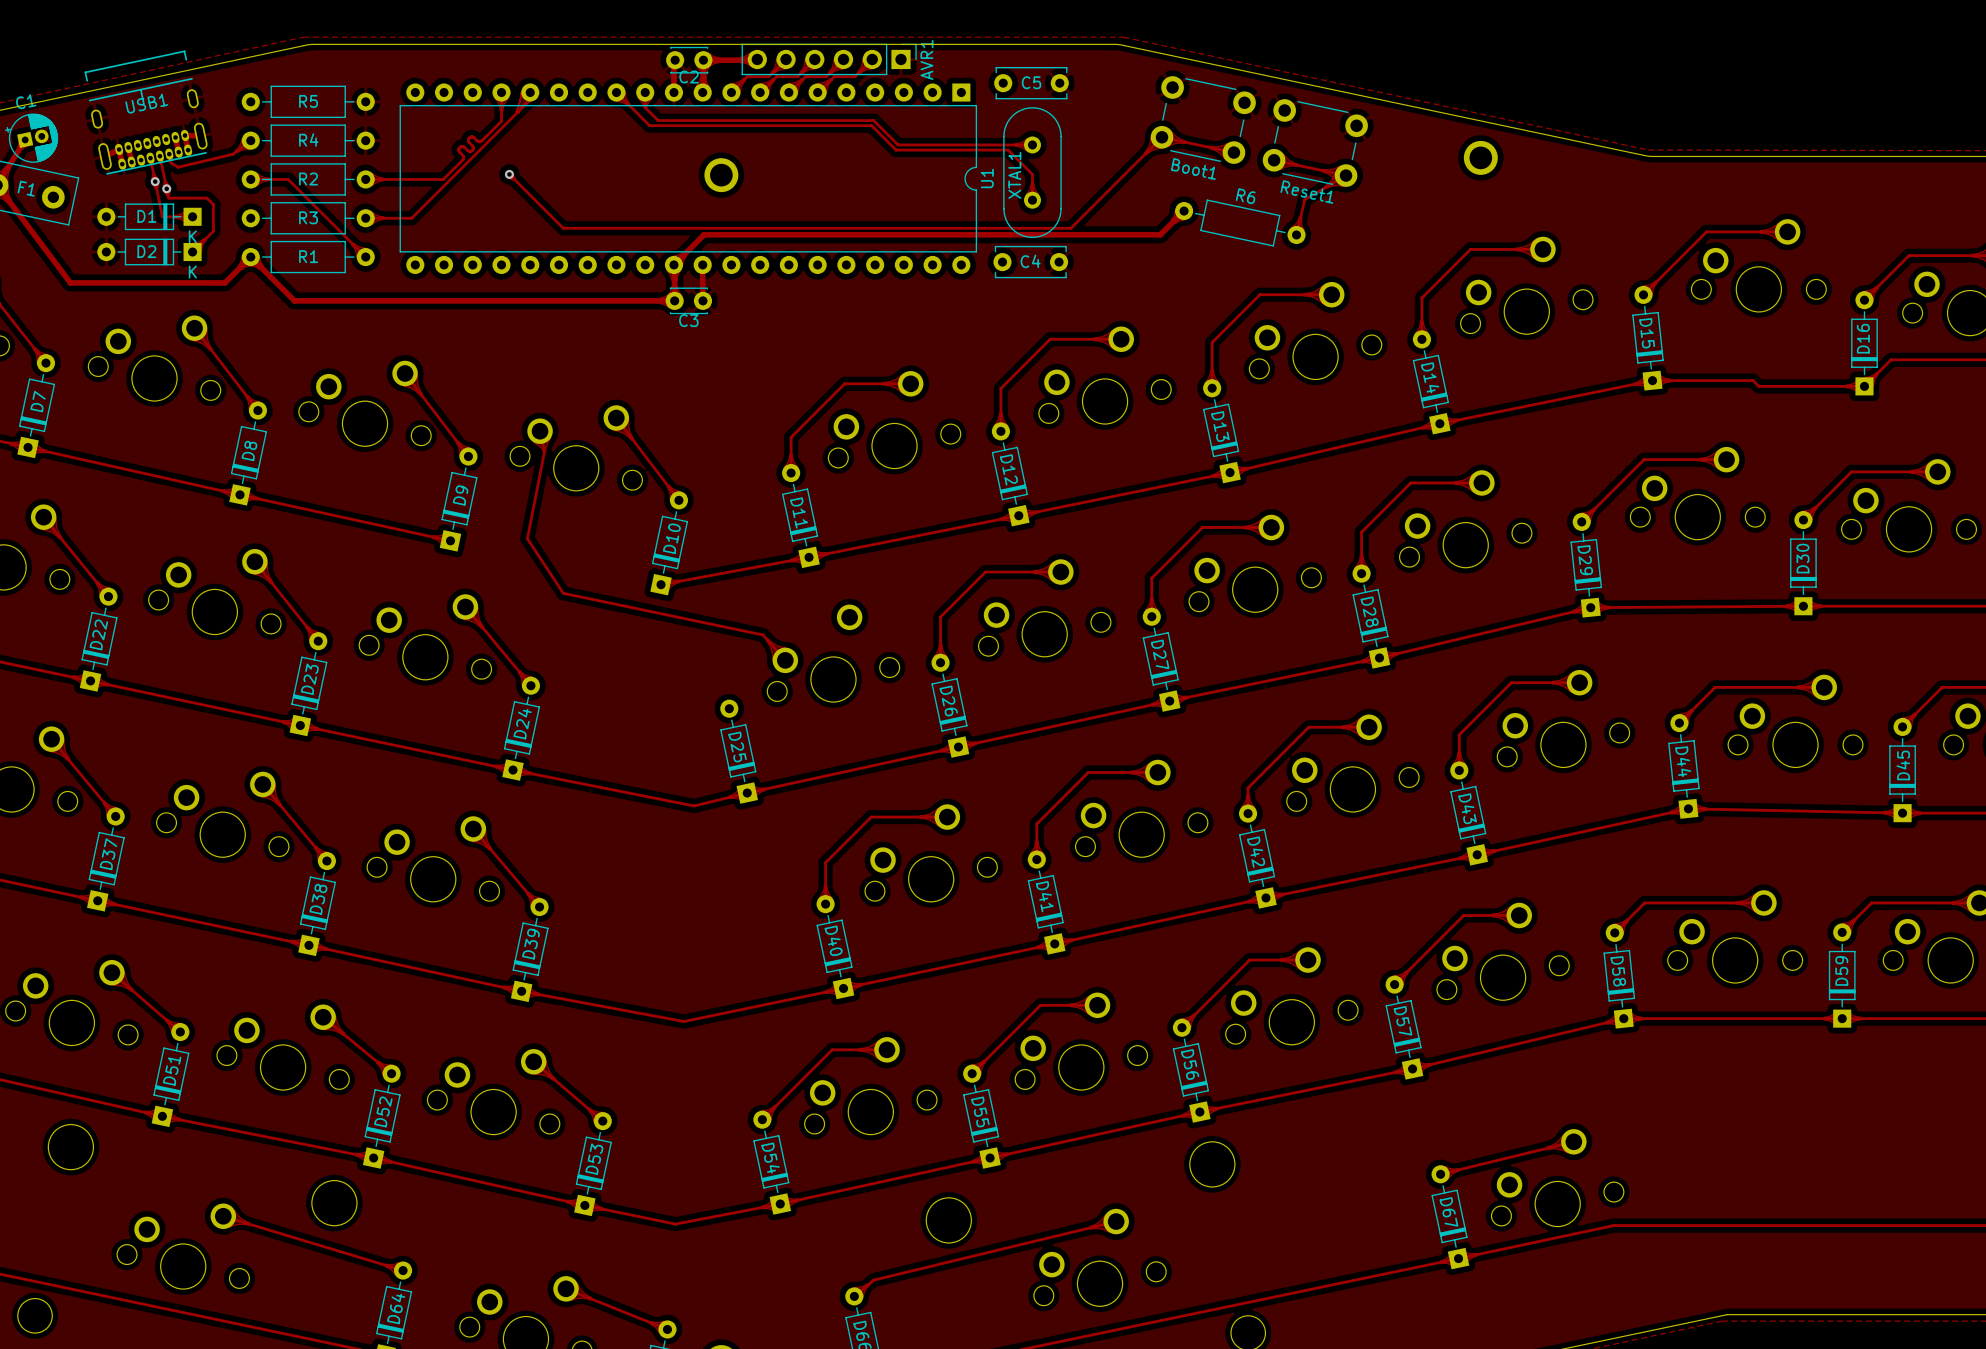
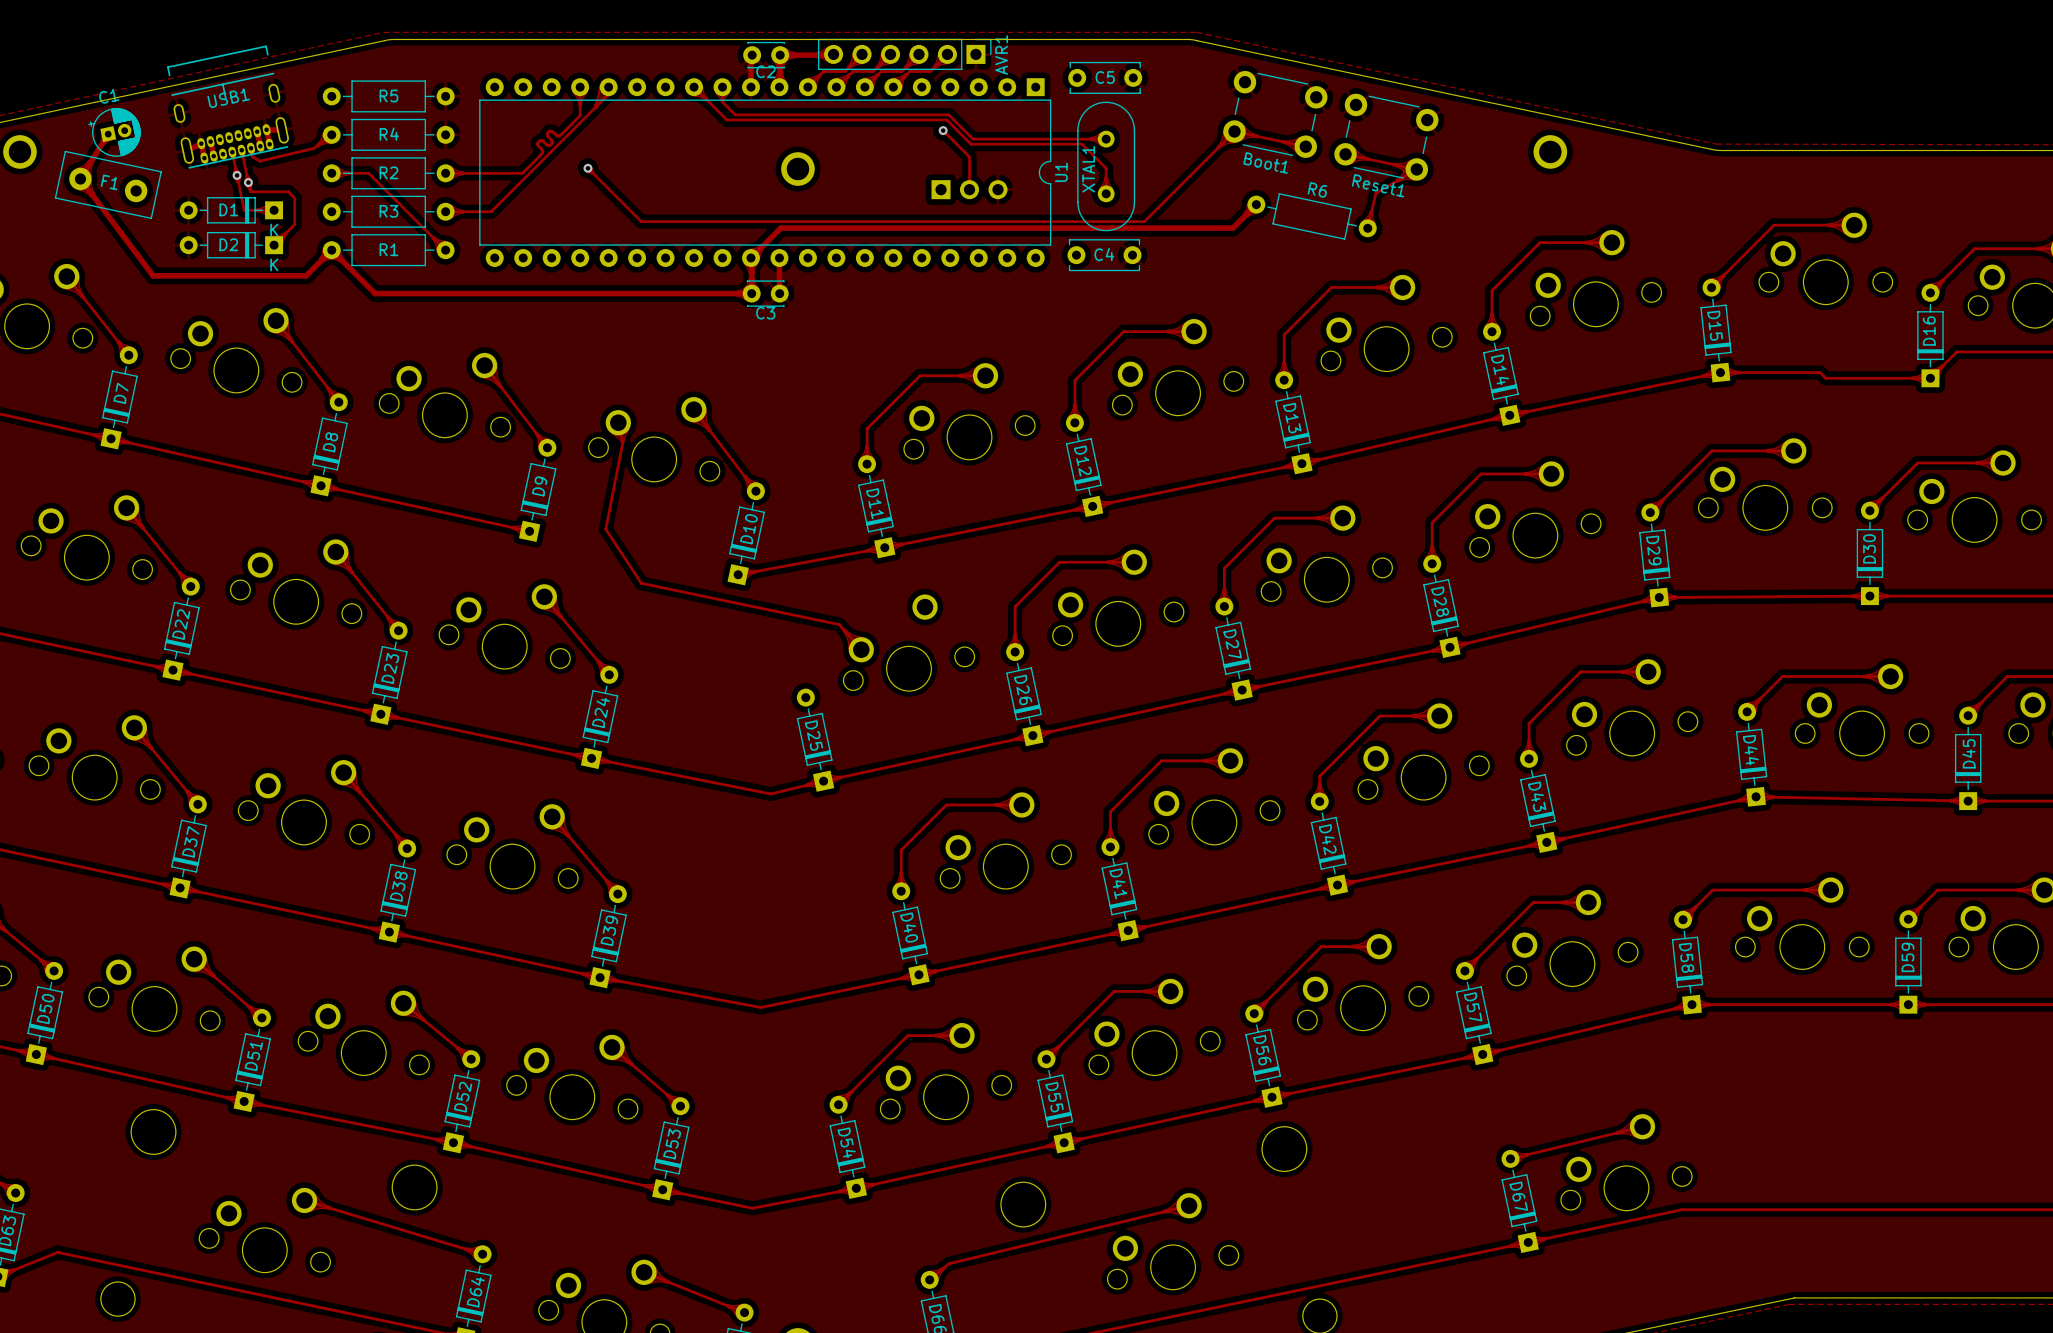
track: none -> (943, 130) (969, 156) (969, 189)
via: none -> (943, 130)
part: none -> (969, 189)

